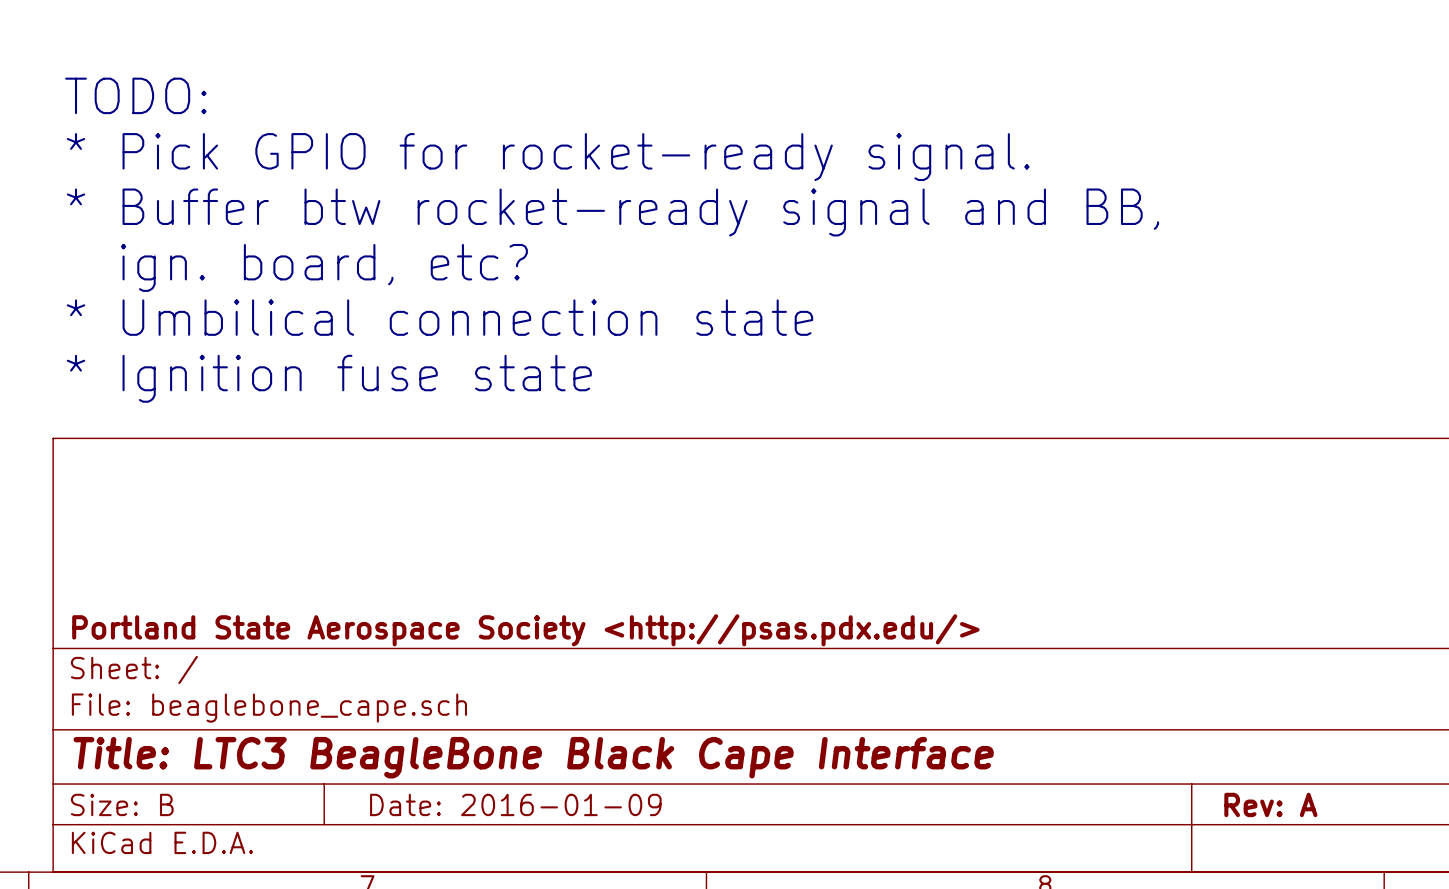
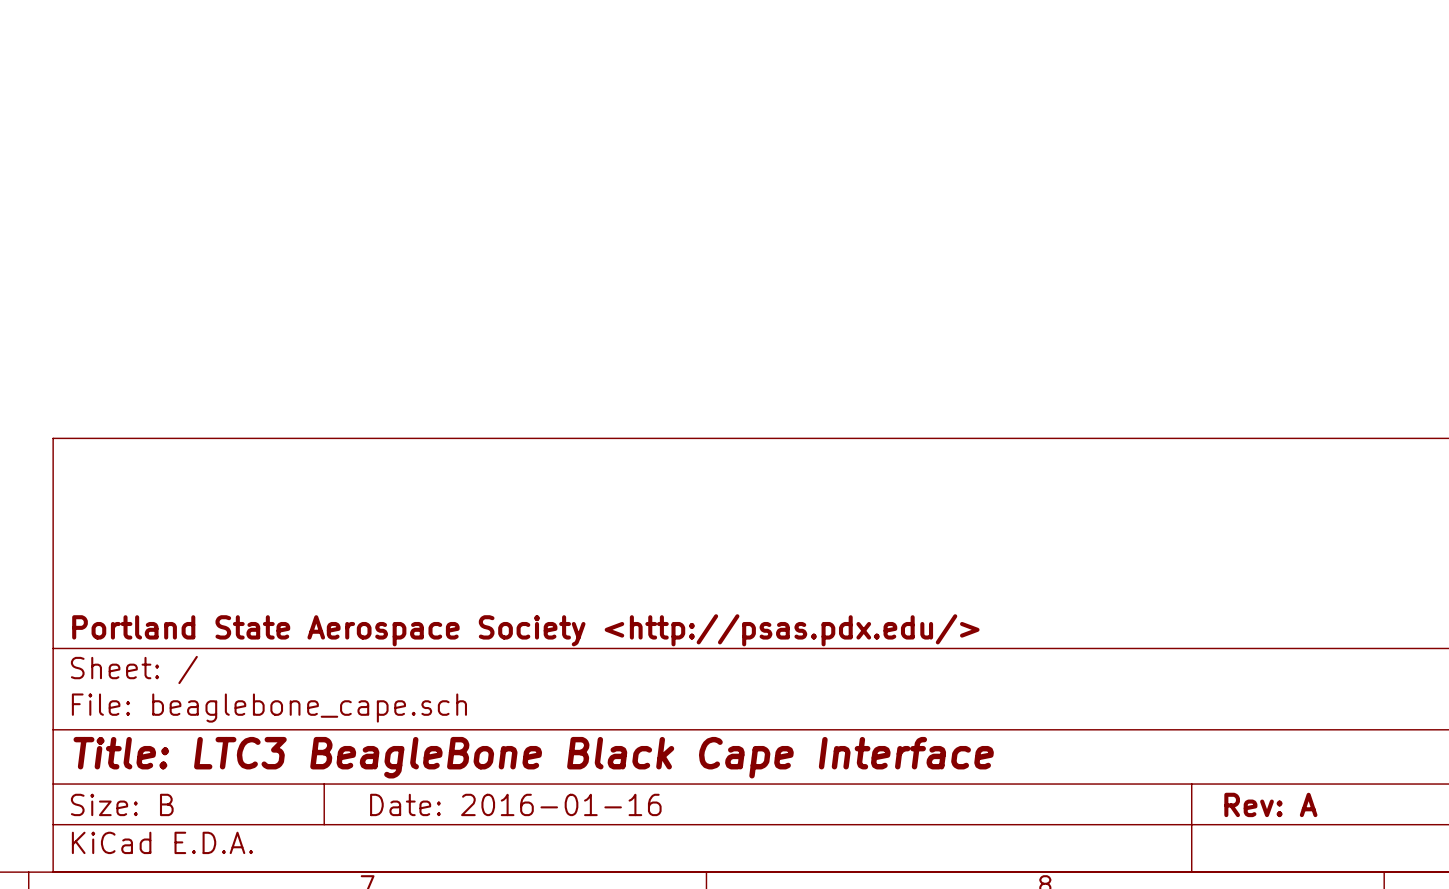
text: TODO: (135, 95) -> none
text: * Pick GPIO for rocket-ready signal. (548, 157) -> none
text: * Buffer btw rocket-ready signal and BB, (612, 212) -> none
text: ign. board, etc? (324, 267) -> none
text: * Umbilical connection state (439, 317) -> none
text: * Ignition fuse state (329, 378) -> none
title block: Date: 2016-01-09 (515, 804) -> Date: 2016-01-16 (515, 804)

